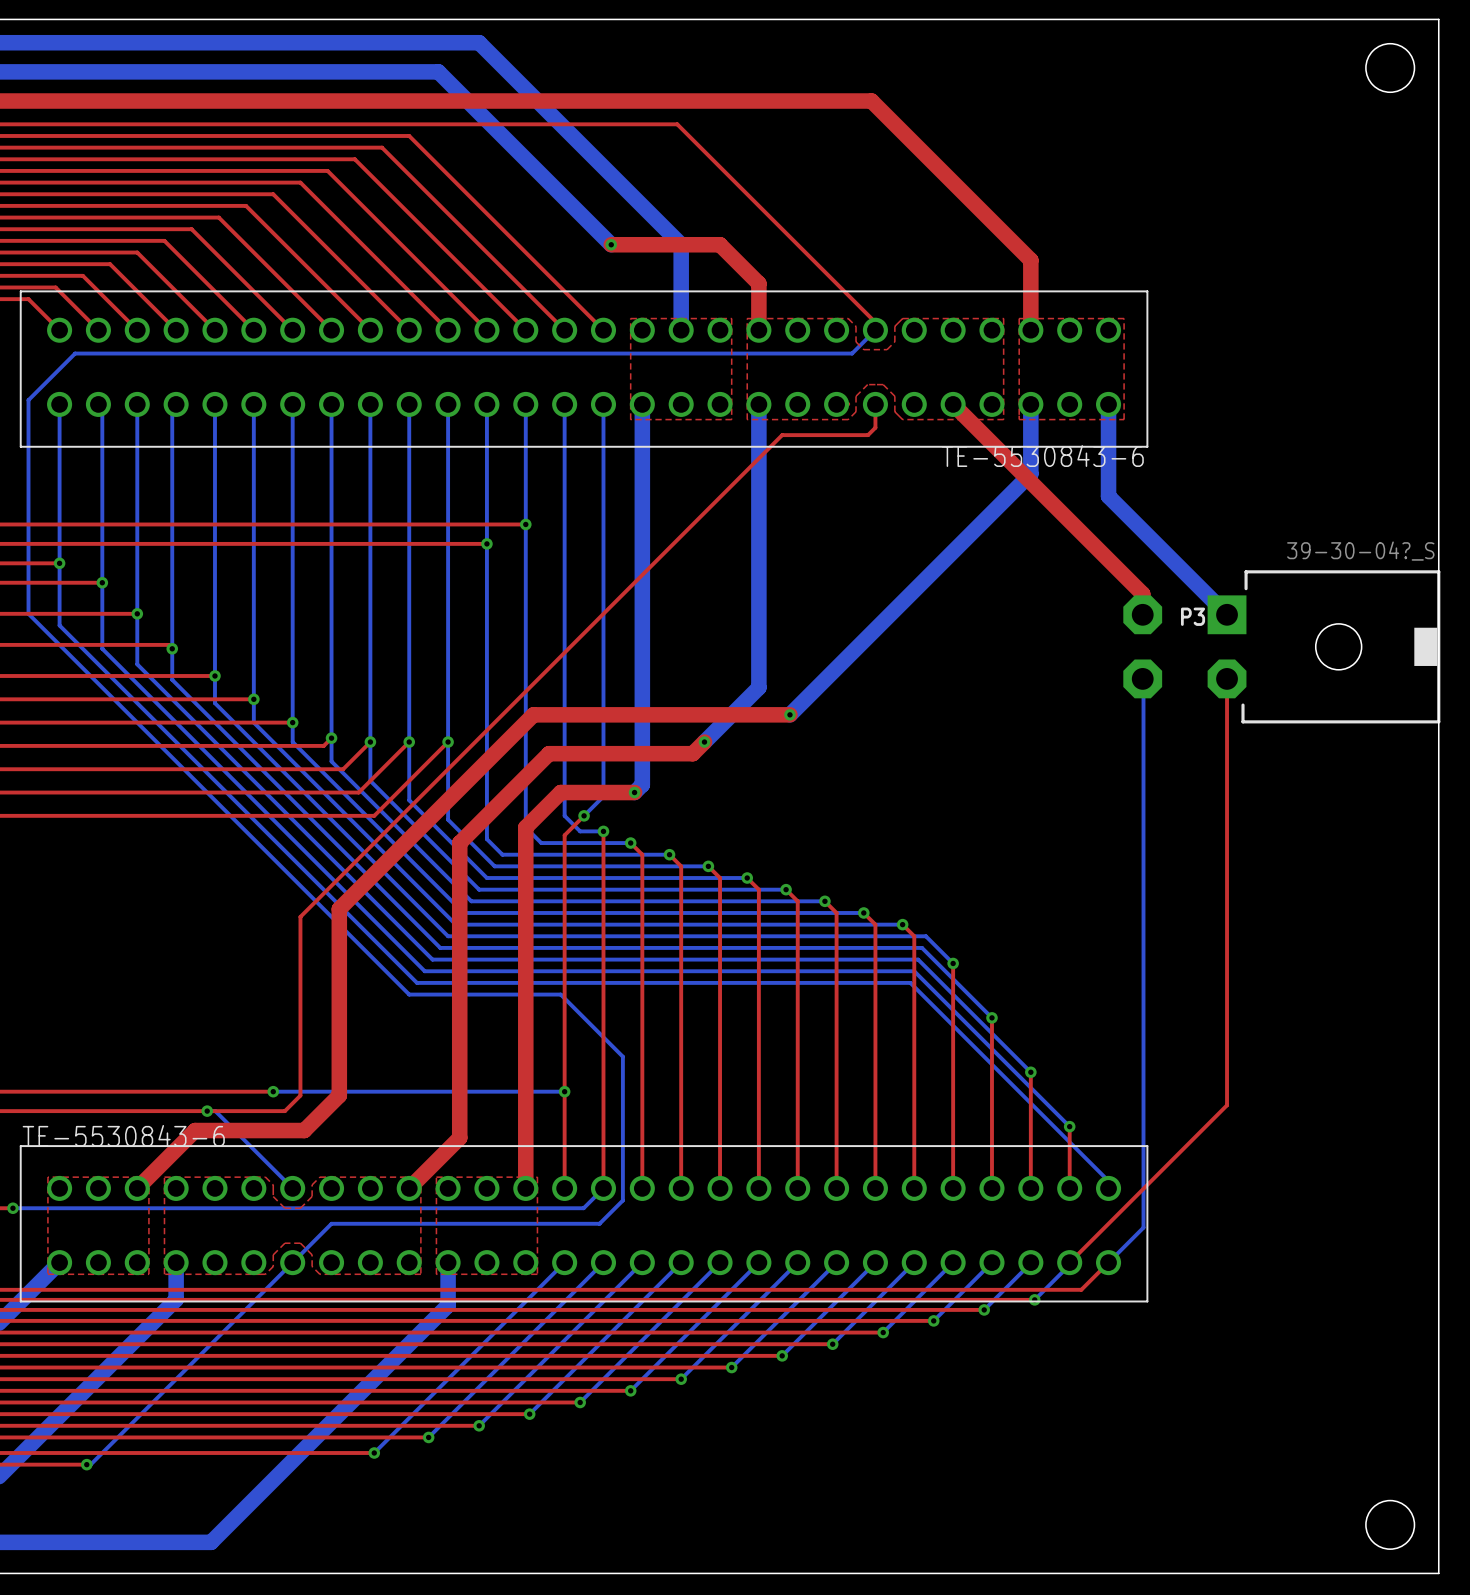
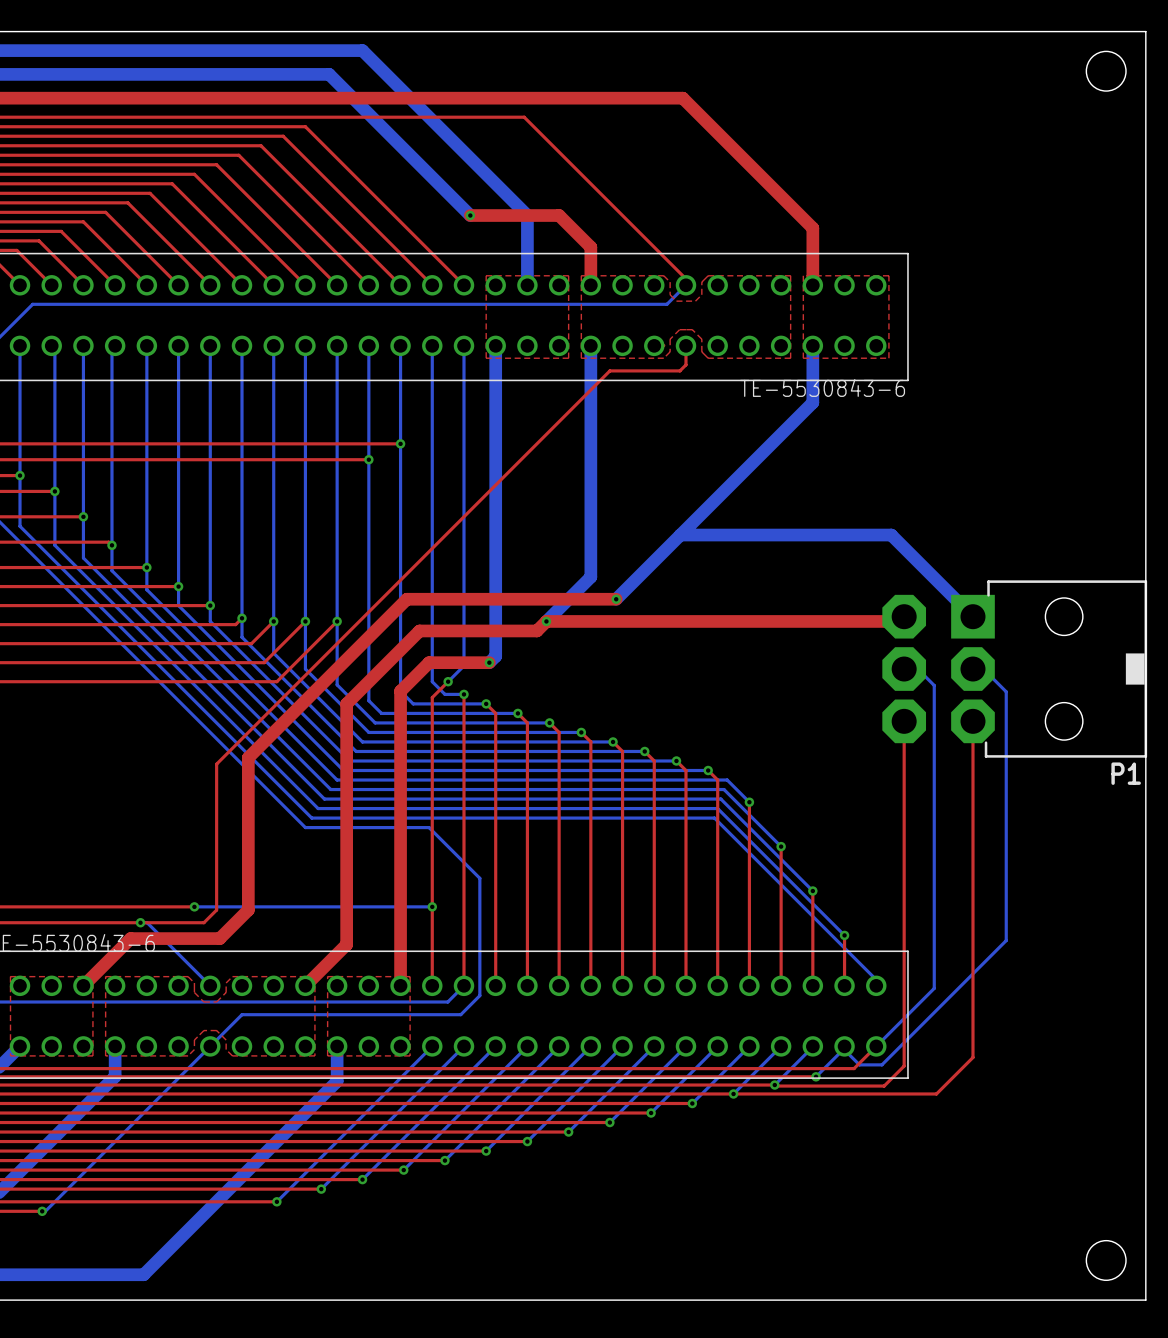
top track: (953, 404) (1142, 594) (1142, 614) -> none
bottom track: (1108, 404) (1108, 496) (1227, 614) -> none
bottom track: none -> (680, 535) (891, 535) (972, 616)
P3: 39-30-04?_S (1281, 646) -> none
bottom track: (1142, 678) (1143, 1227) -> (904, 669) (917, 669) (934, 685) (934, 988) (904, 1017)
top track: (1227, 678) (1227, 864) -> none
top track: none -> (904, 616) (899, 621) (546, 621)
bottom track: none -> (972, 669) (983, 669) (1006, 691) (1006, 940) (881, 1064) (859, 1064) (843, 1049)
P1: none -> (1014, 669)
top track: none -> (904, 721) (904, 1066) (884, 1086) (775, 1086)
top track: (1227, 1105) (1069, 1262) -> (972, 917) (972, 1057) (936, 1093) (733, 1093)

